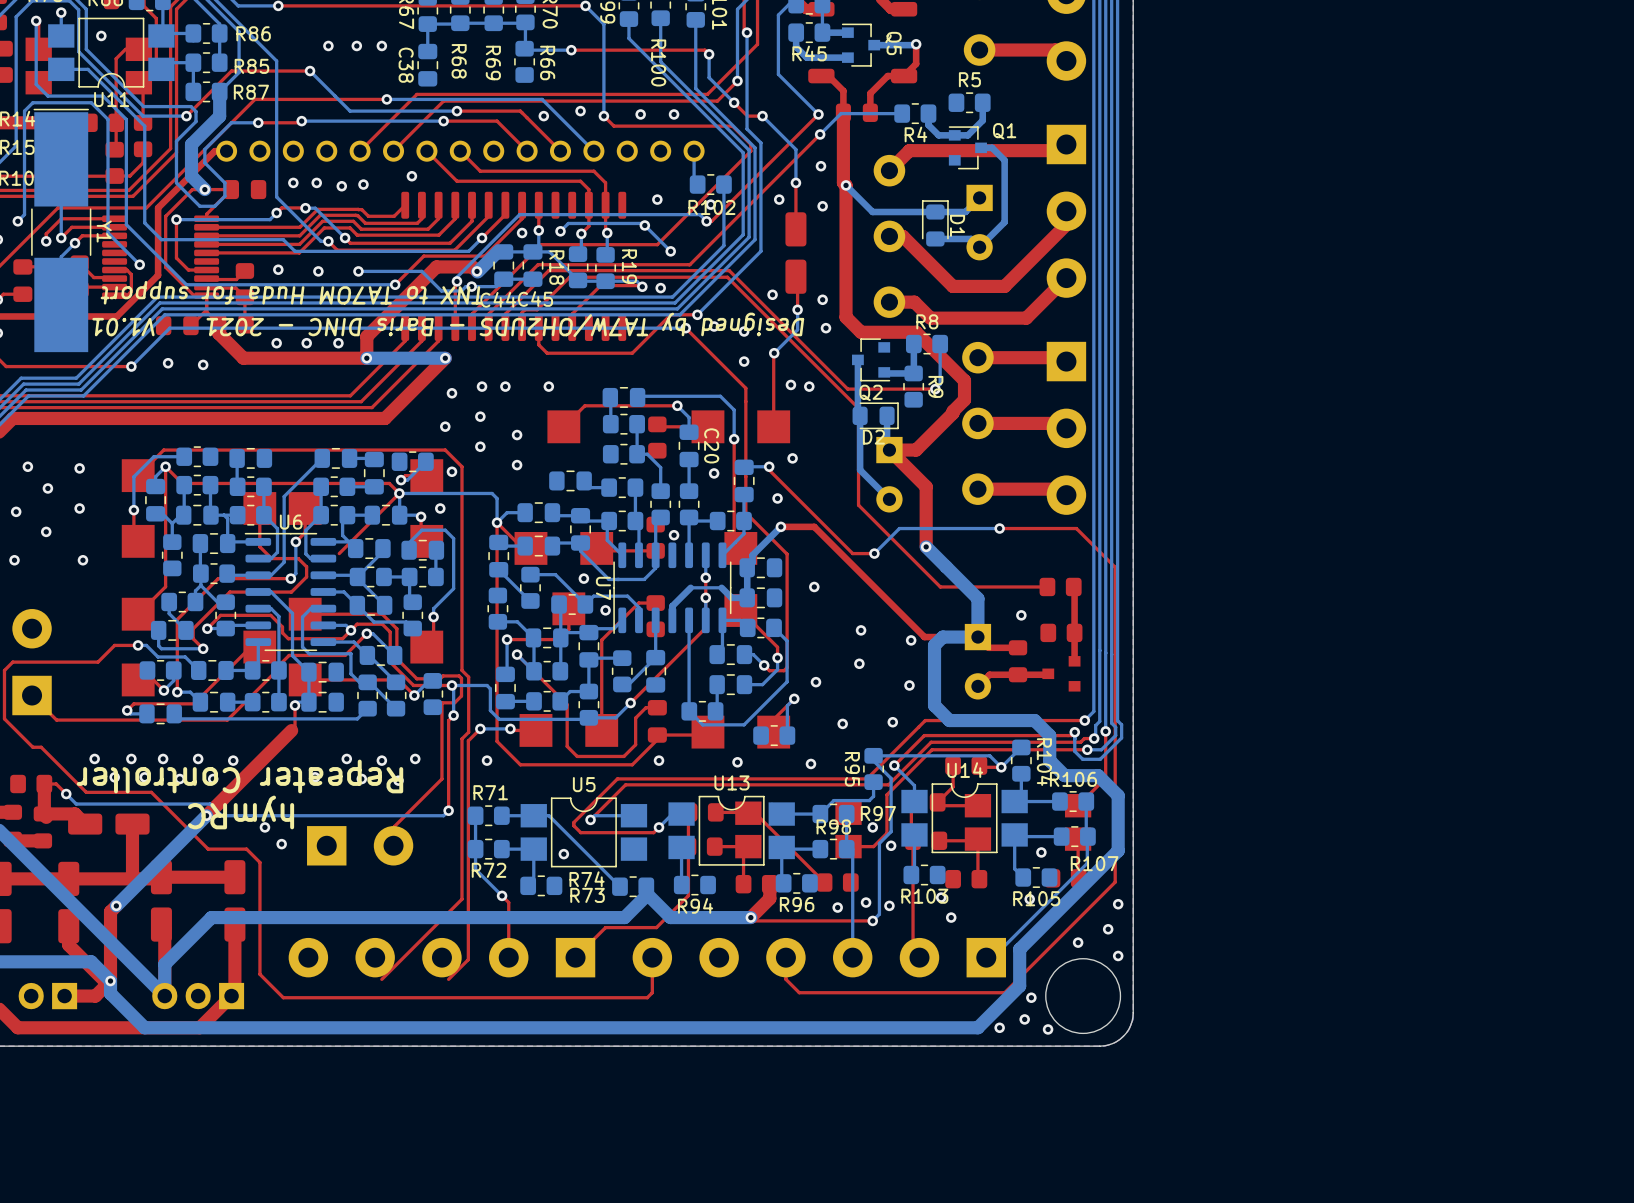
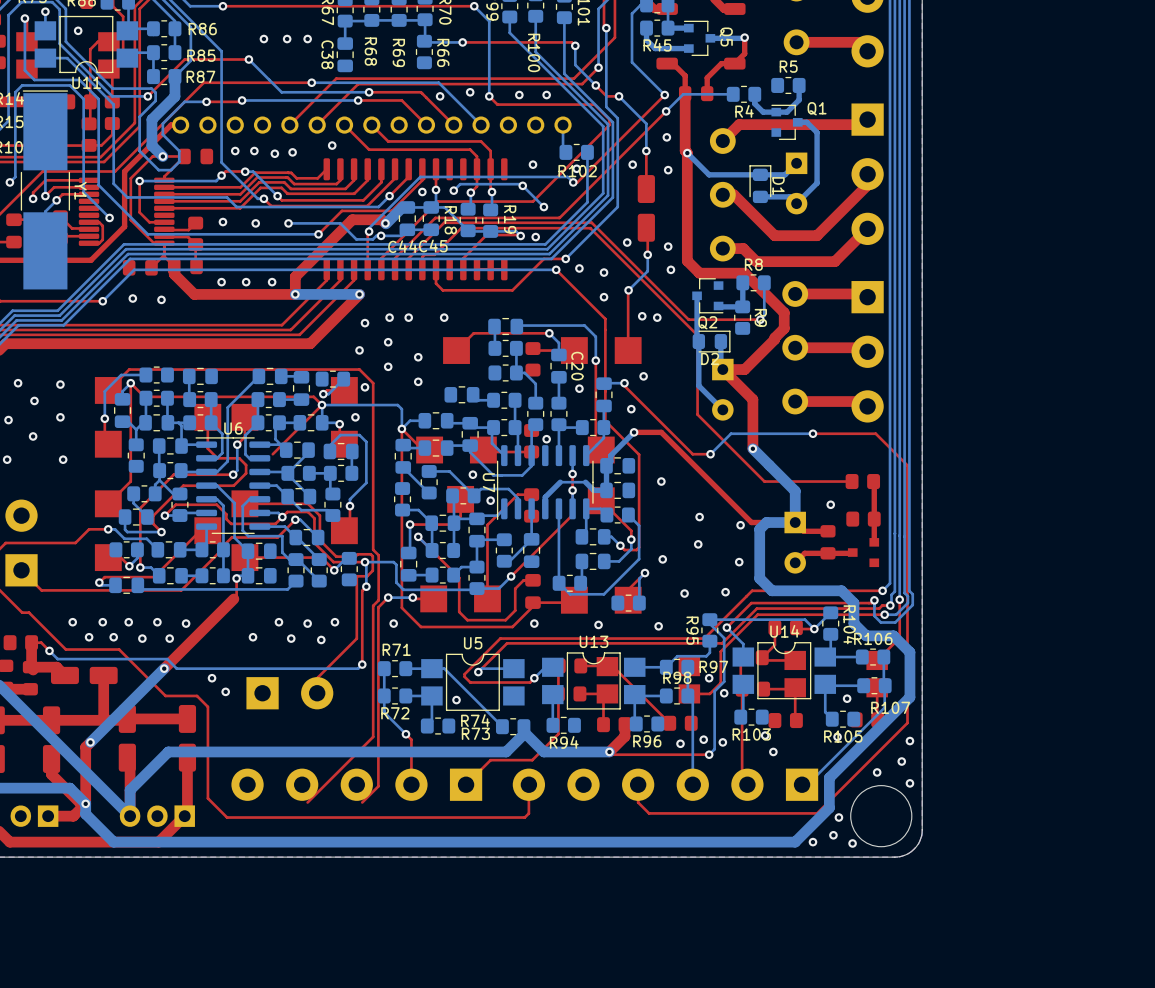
text: TNX to TA7OM Huda for support (291, 292) -> none
text: Designed by TA7W/OH2UDS - Baris DINC - 2021 V1.01 (448, 324) -> none
text: Repeater Controller (239, 776) -> none
text: hymRC (241, 812) -> none

